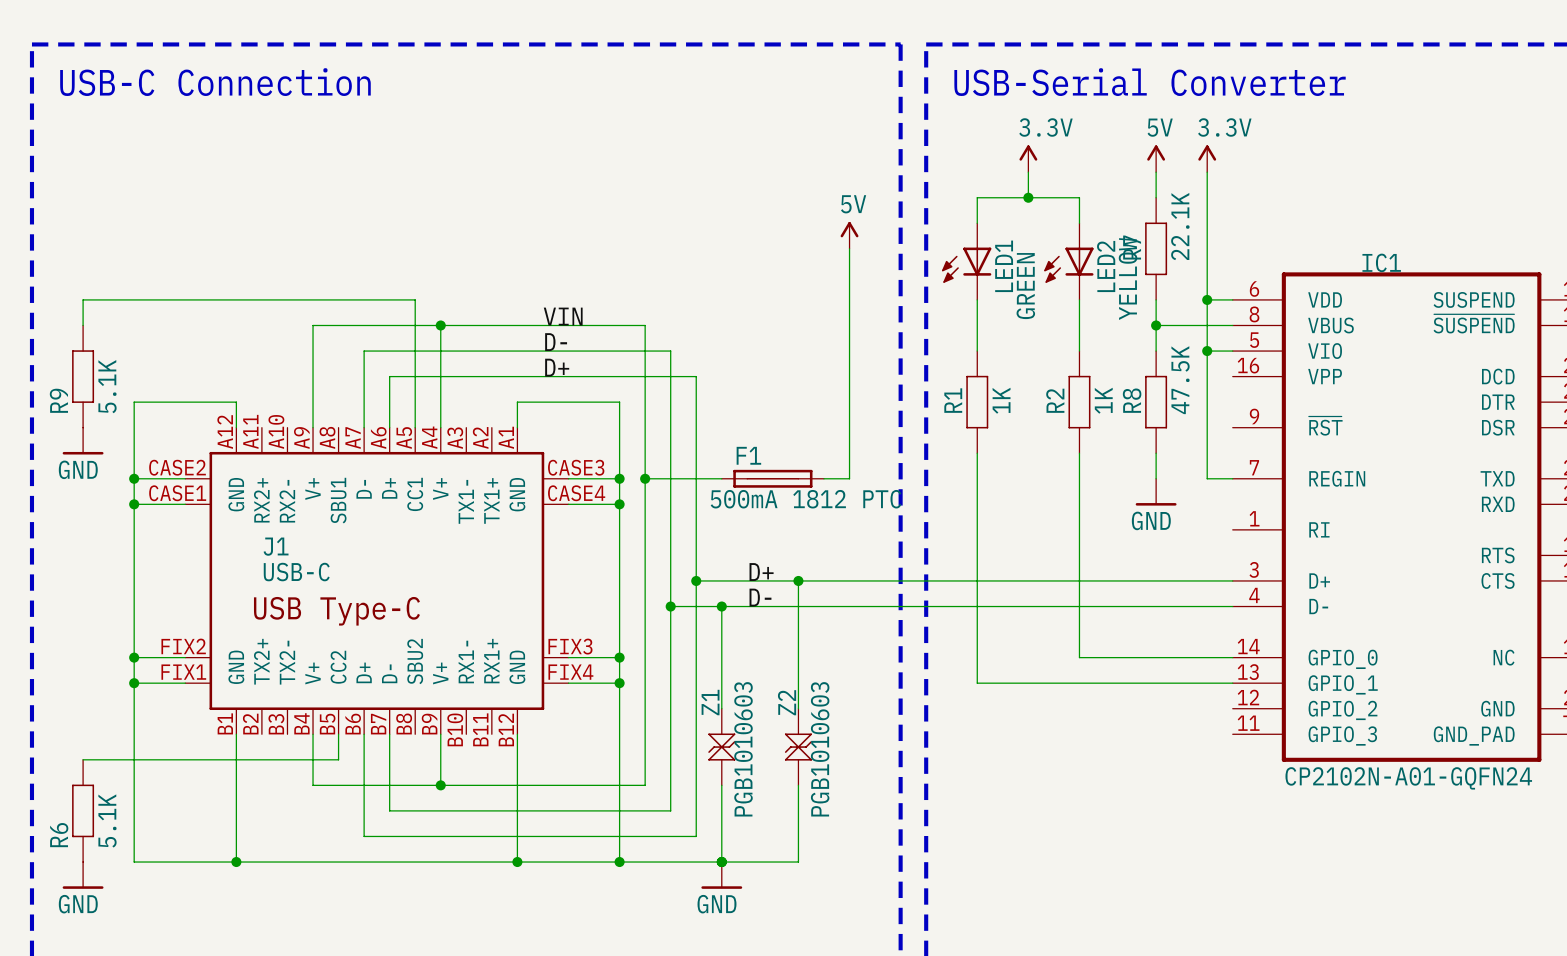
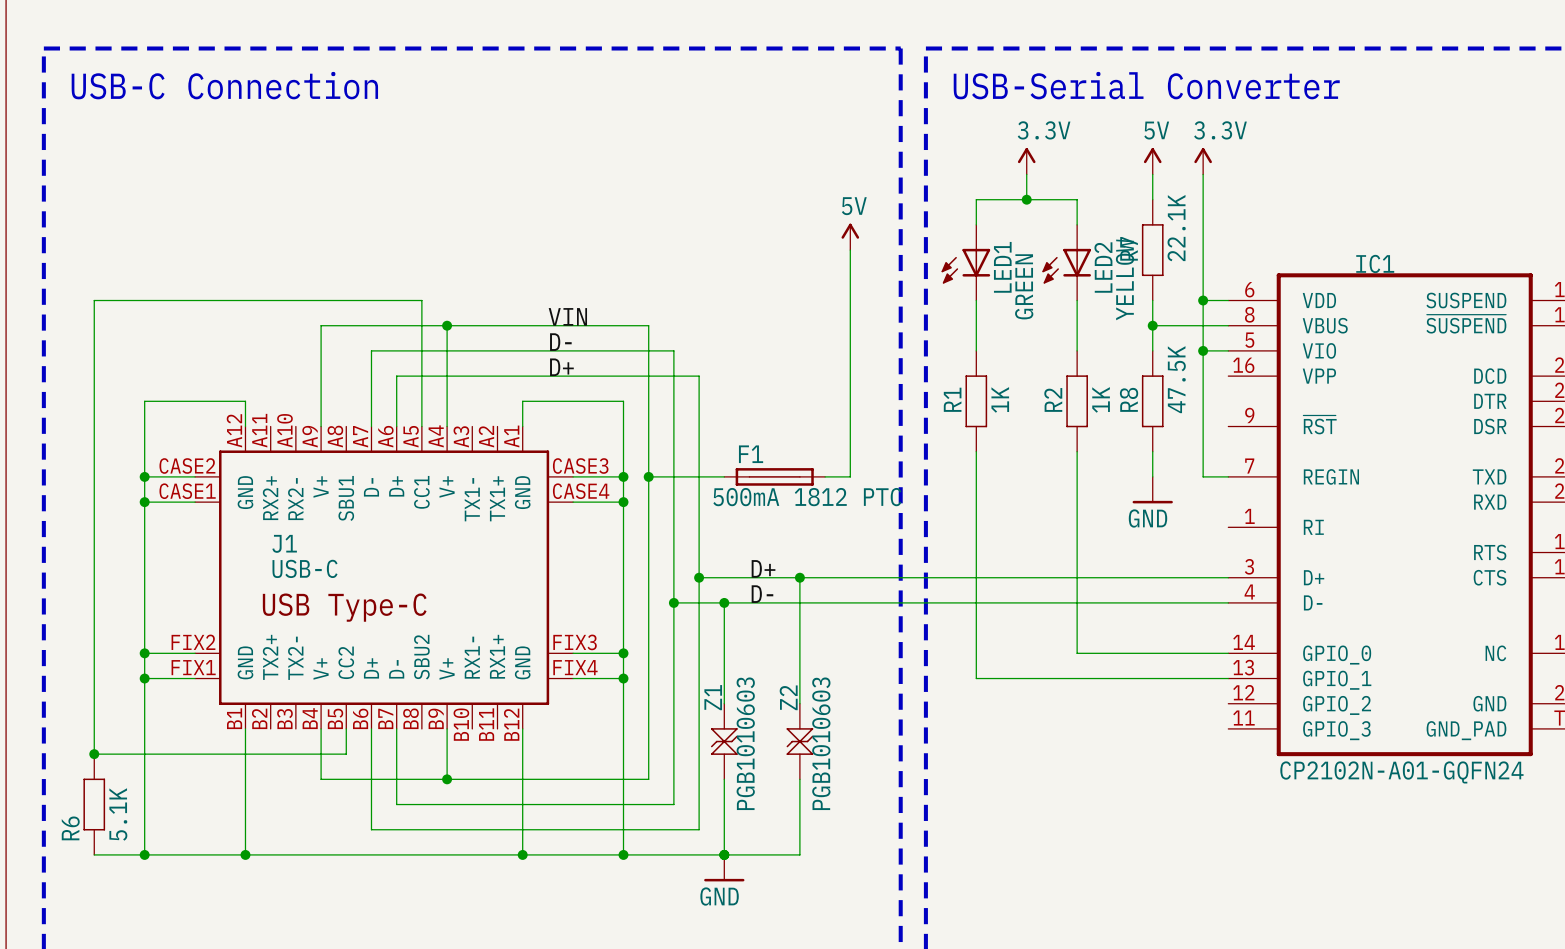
wire: none -> (94, 325) (94, 754)
R9: 5.1K (83, 376) -> none
power symbol: GND (83, 441) -> none
junction: none -> (94, 754)
wire: none -> (94, 854) (144, 854)
junction: none -> (144, 854)
power symbol: GND (83, 875) -> none

